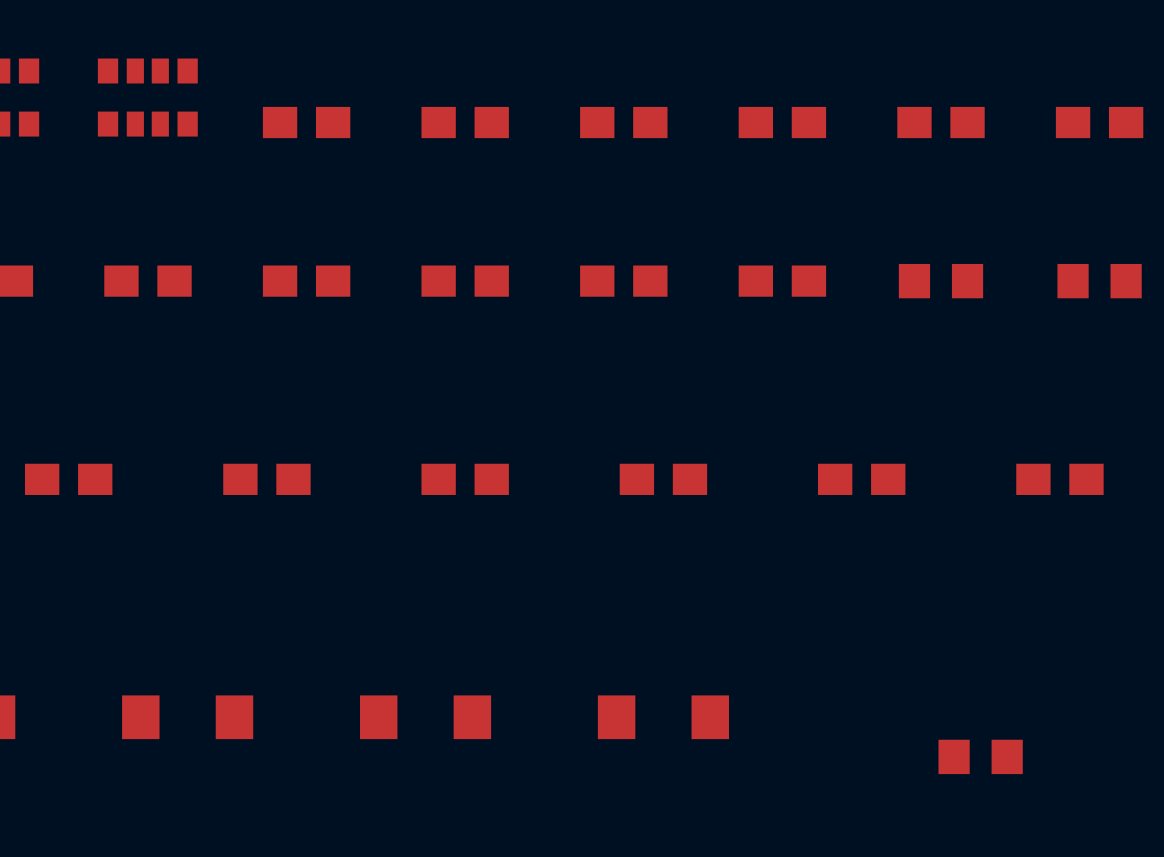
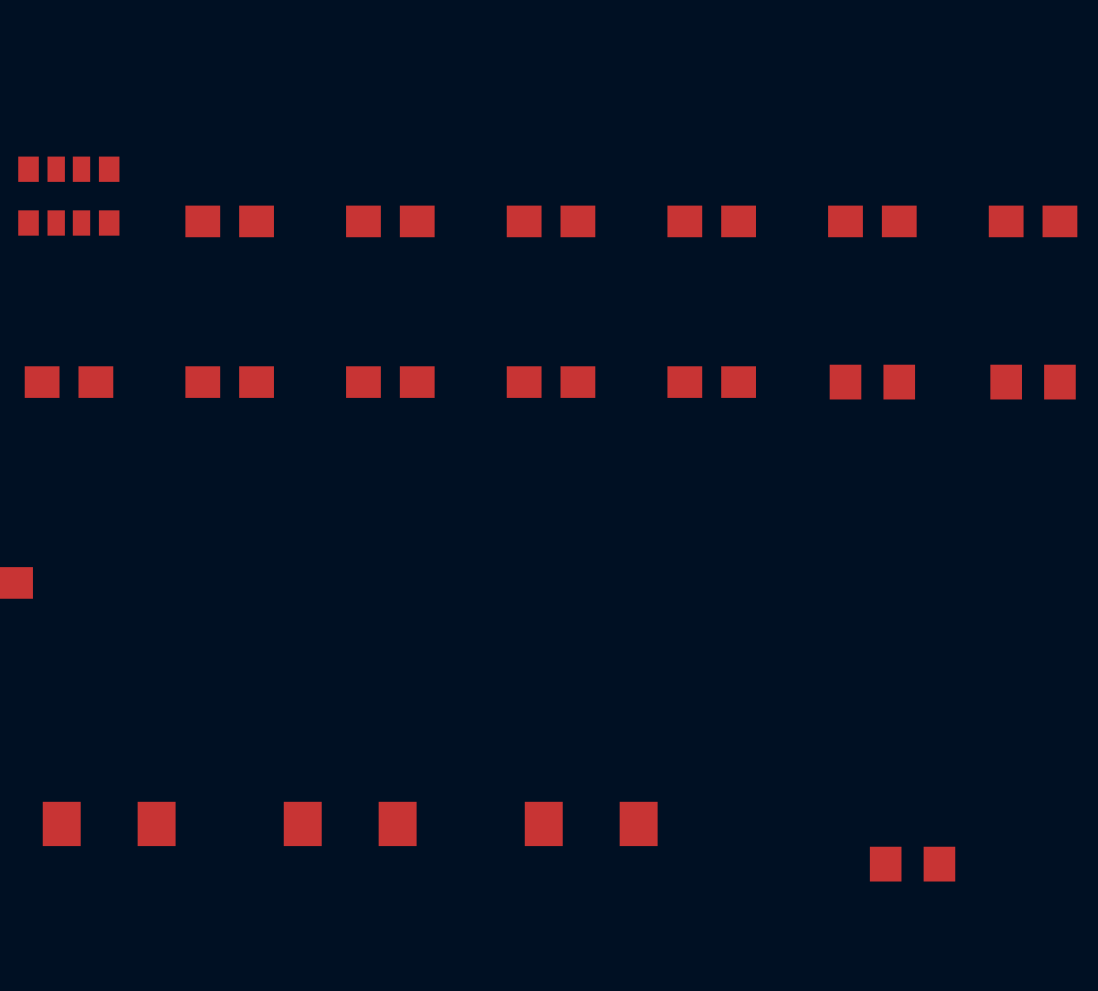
part: (266, 479) -> none
part: (465, 479) -> none
part: (663, 479) -> none
part: (861, 479) -> none
part: (1059, 479) -> none

